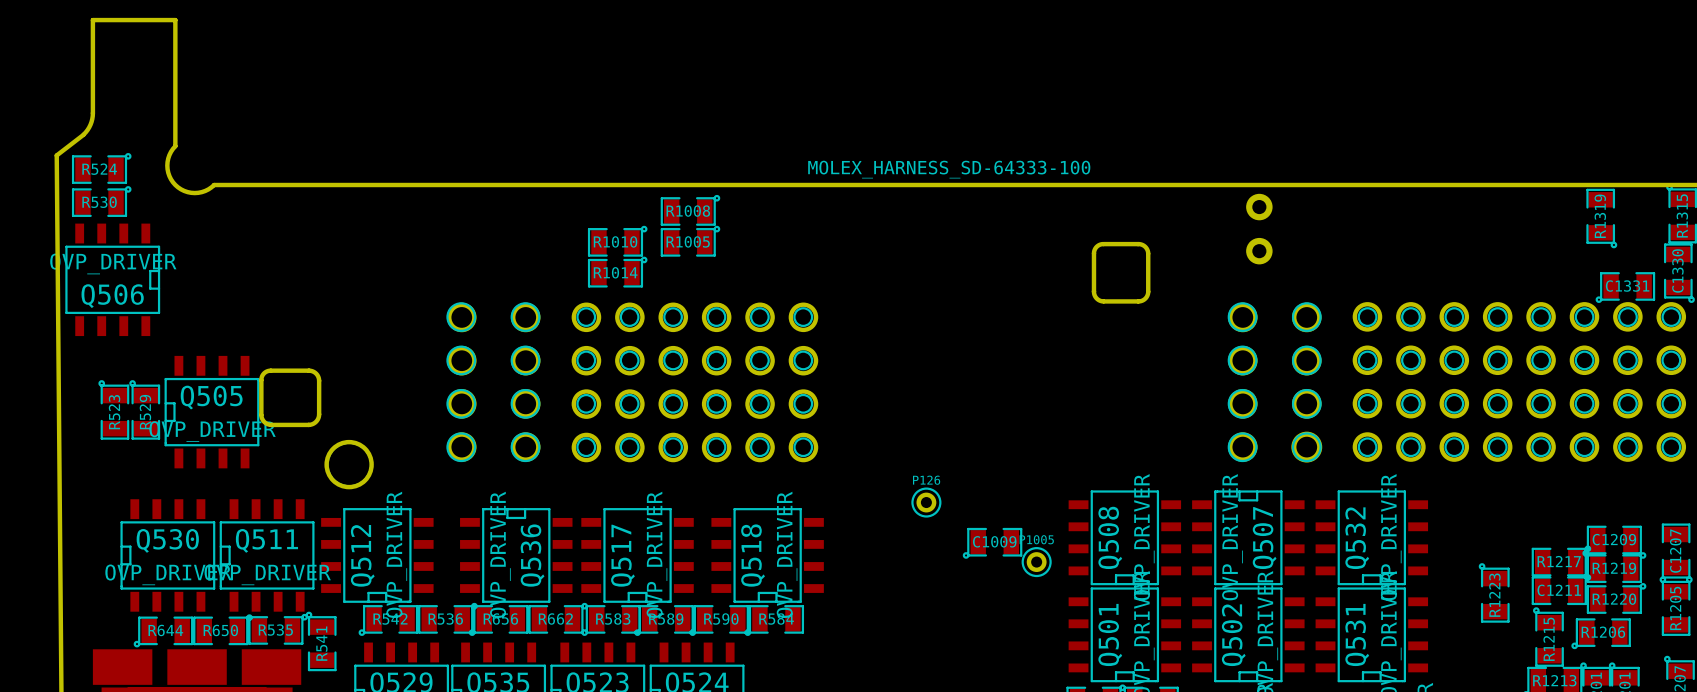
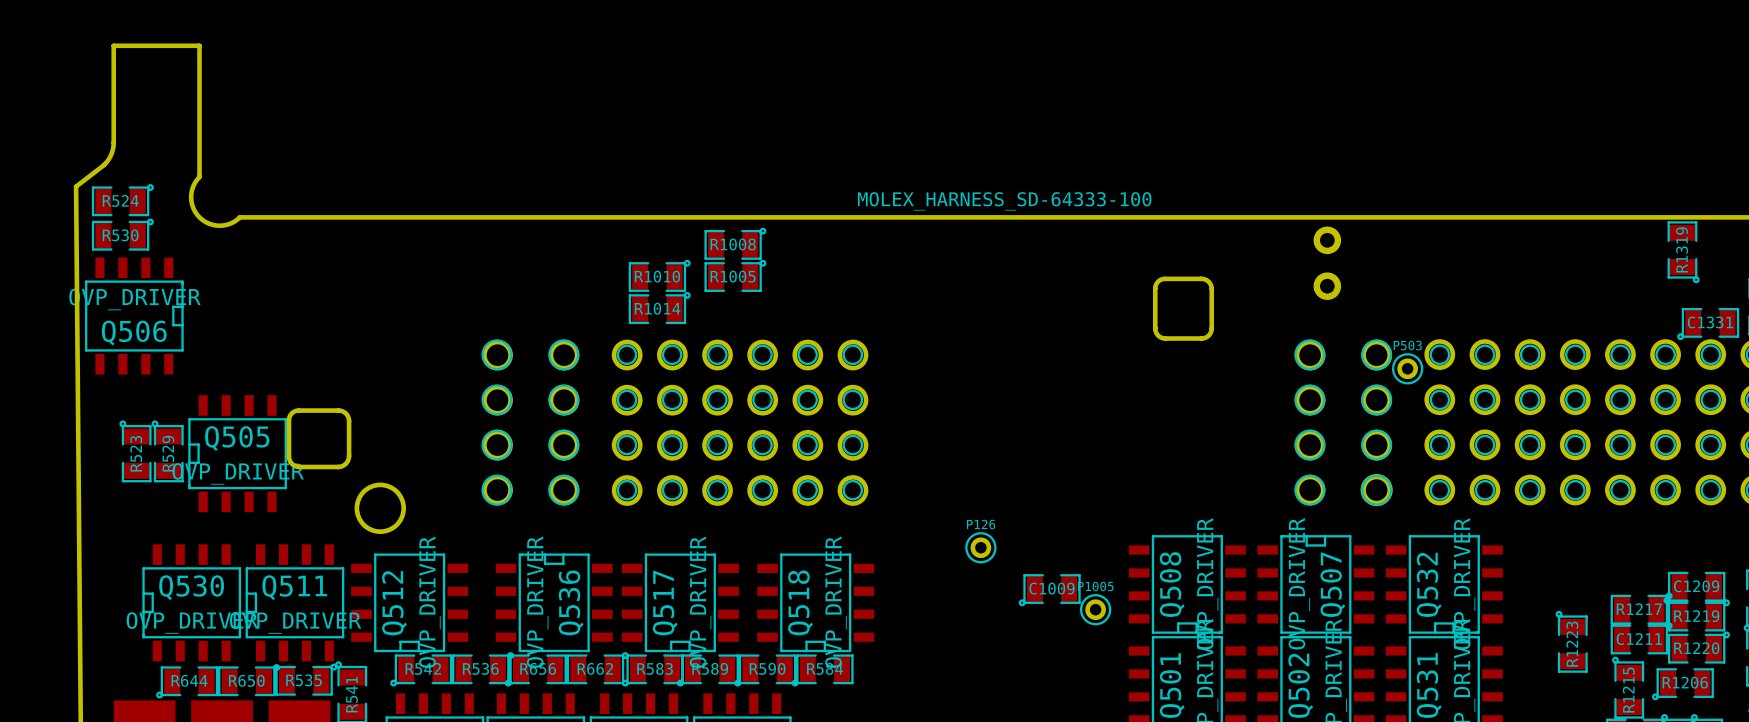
P503: none -> (1407, 368)

